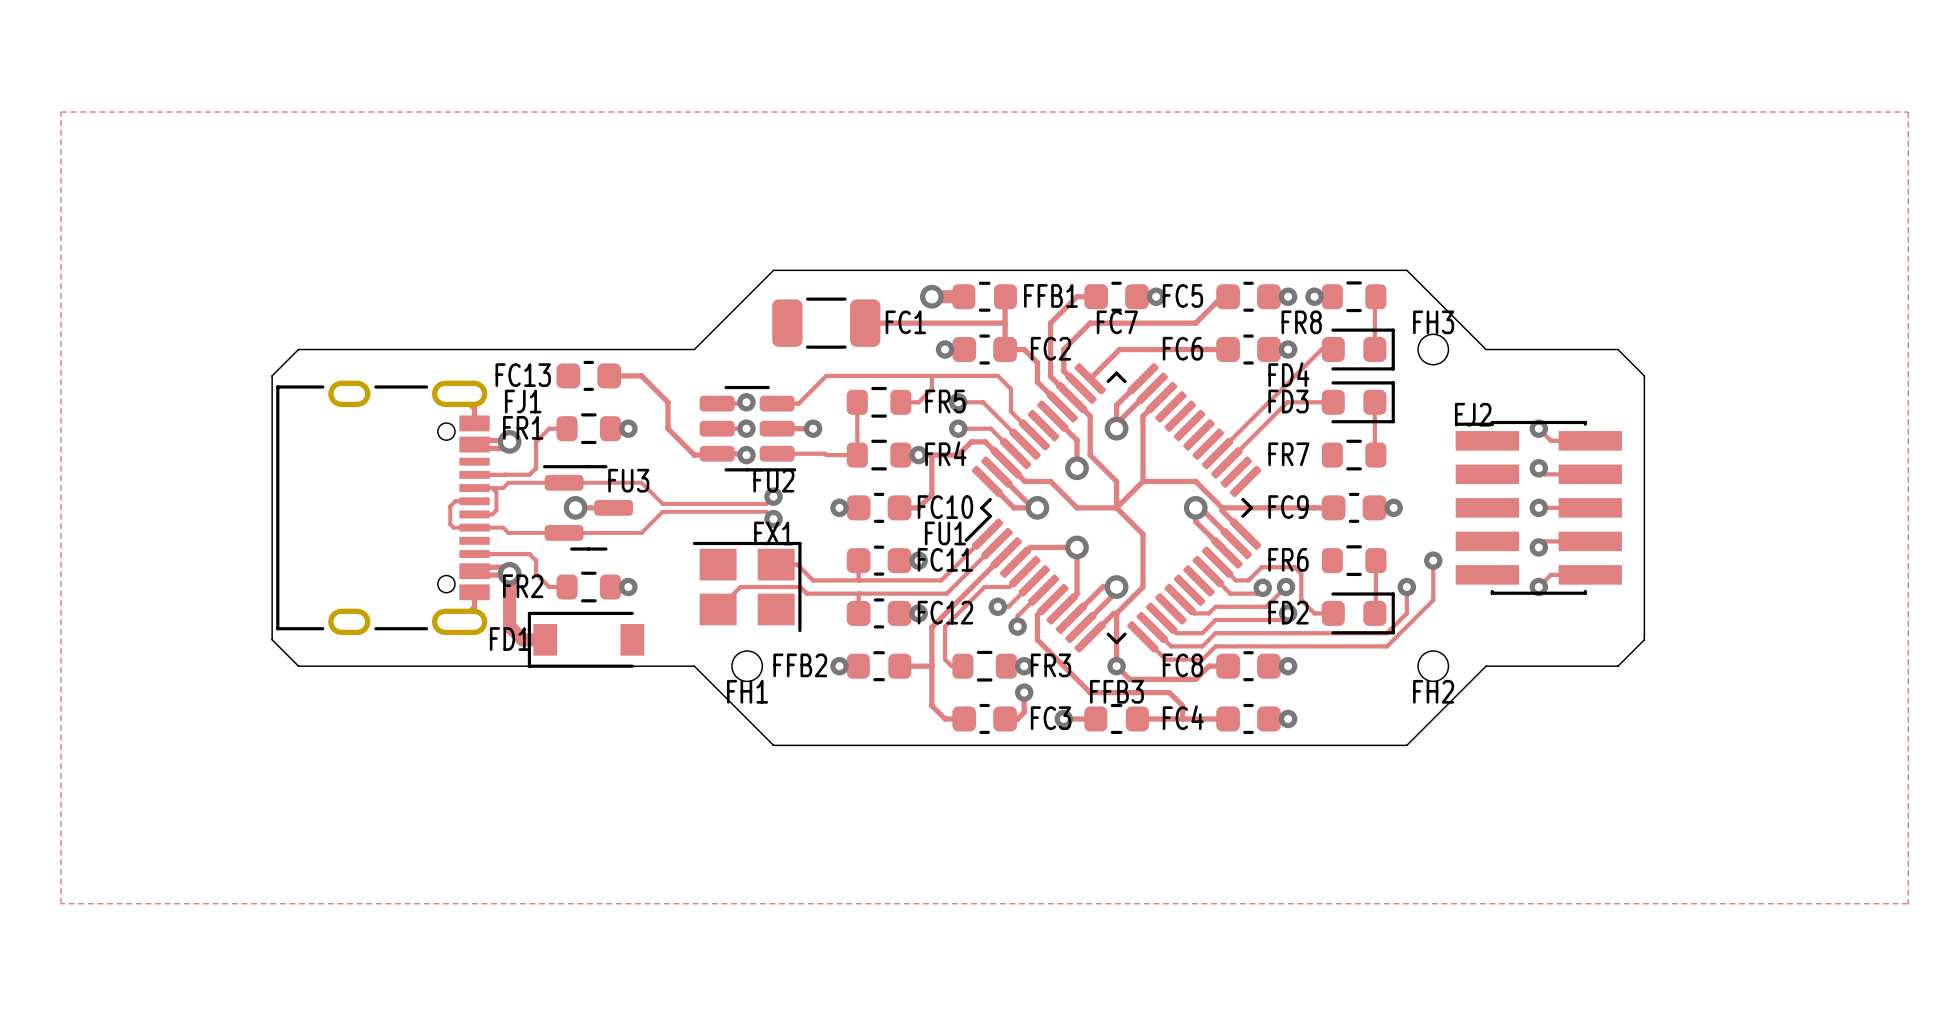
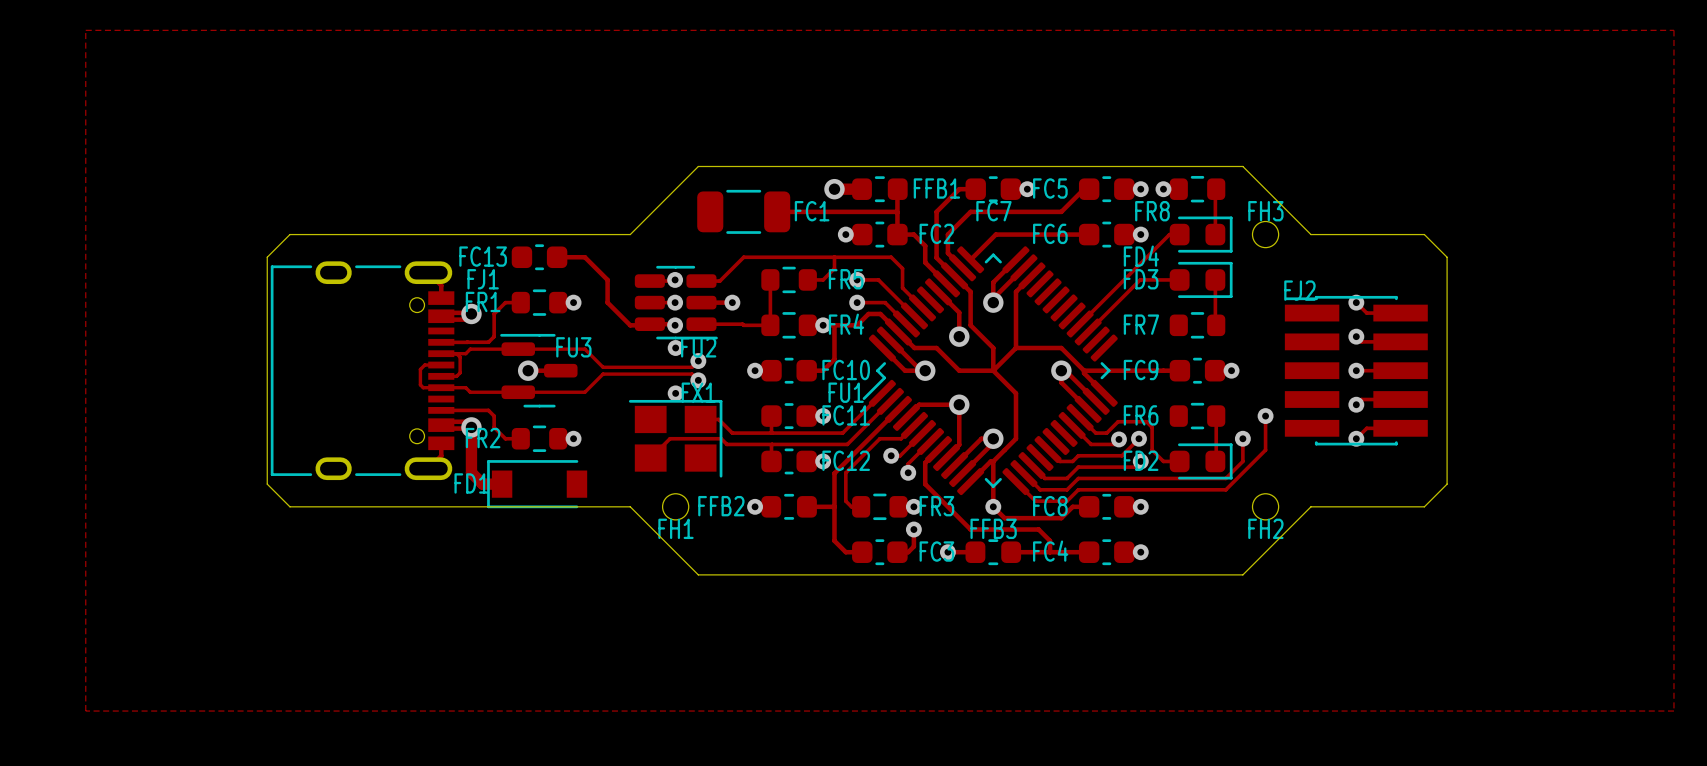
via: none -> (675, 348)
via: none -> (675, 393)

